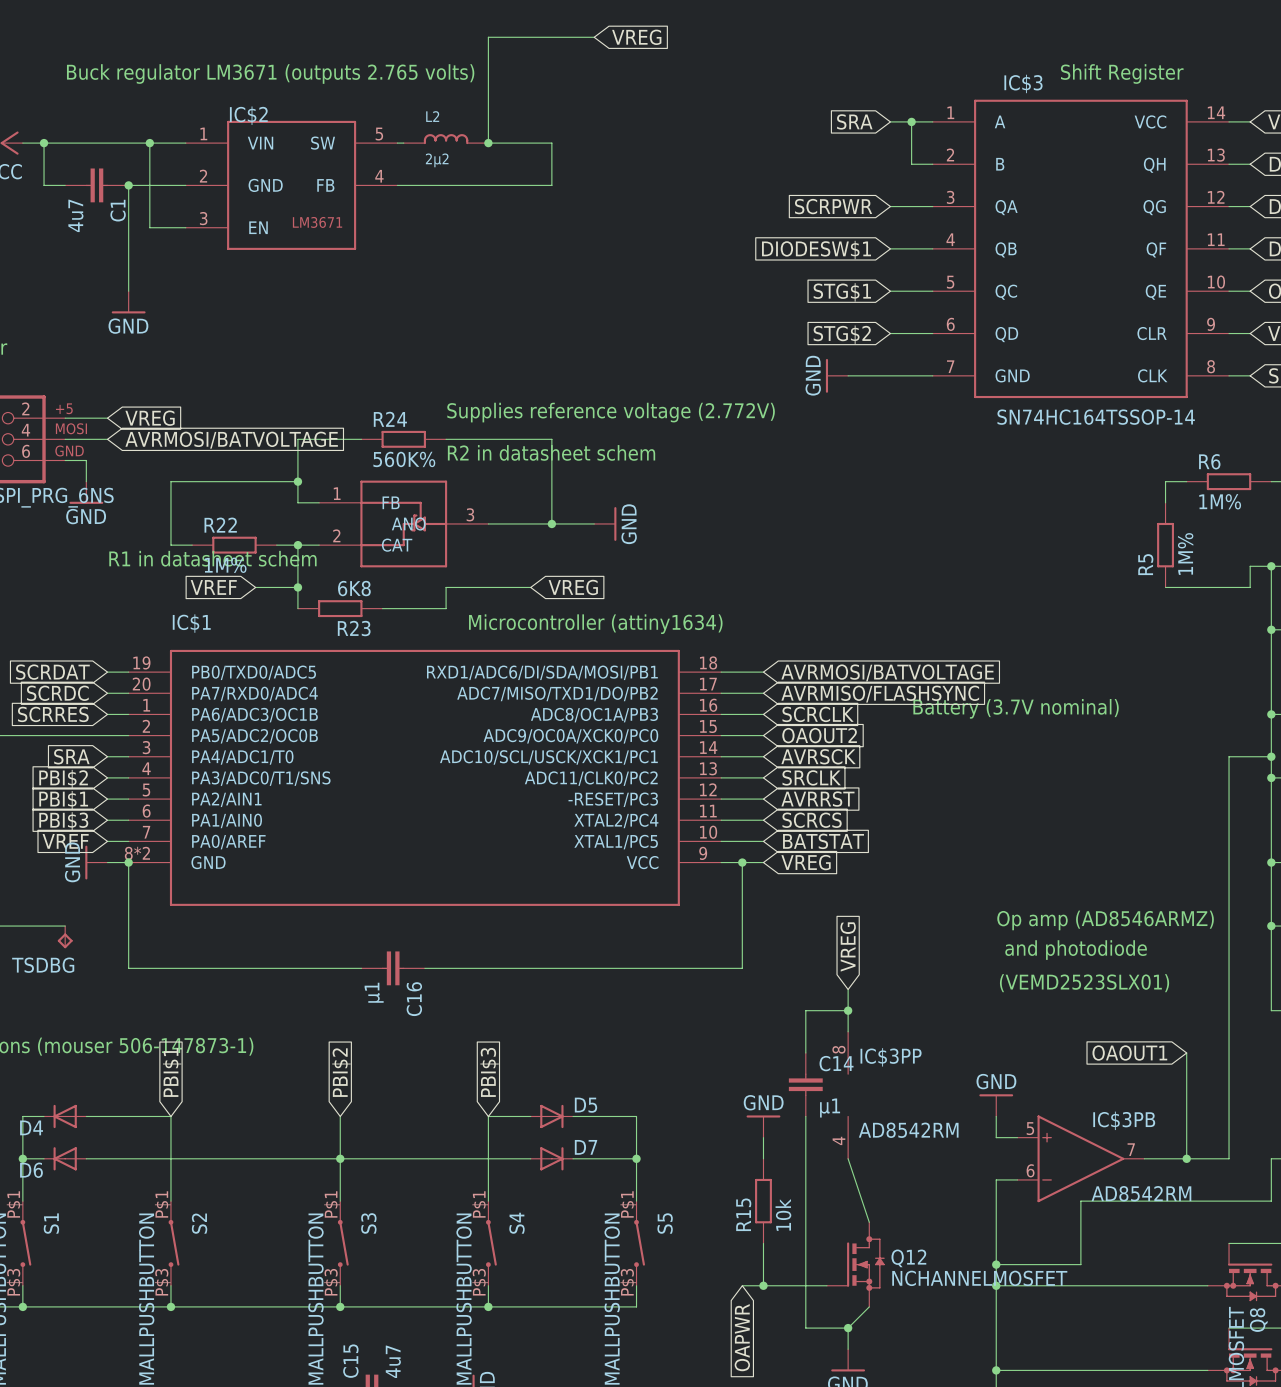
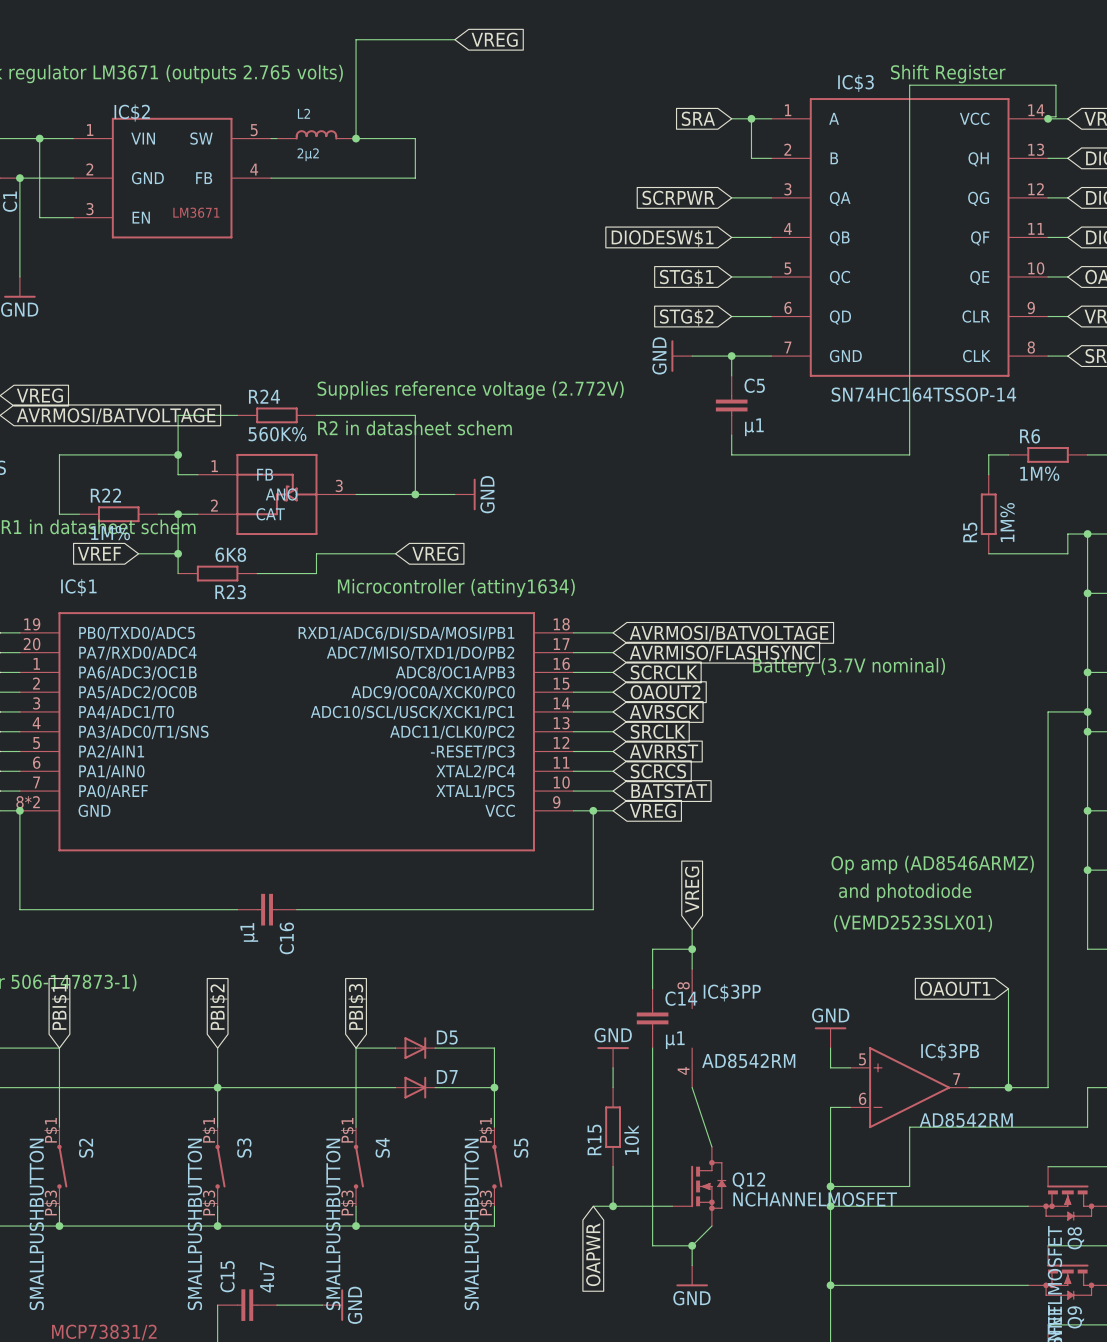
wire: none -> (1048, 118) (1048, 116) (1055, 116) (1055, 85) (909, 85) (909, 454) (731, 454) (731, 435)
junction: none -> (1048, 118)
wire: none -> (731, 356) (731, 375)
junction: none -> (731, 356)
C5: none -> µ1 (731, 405)

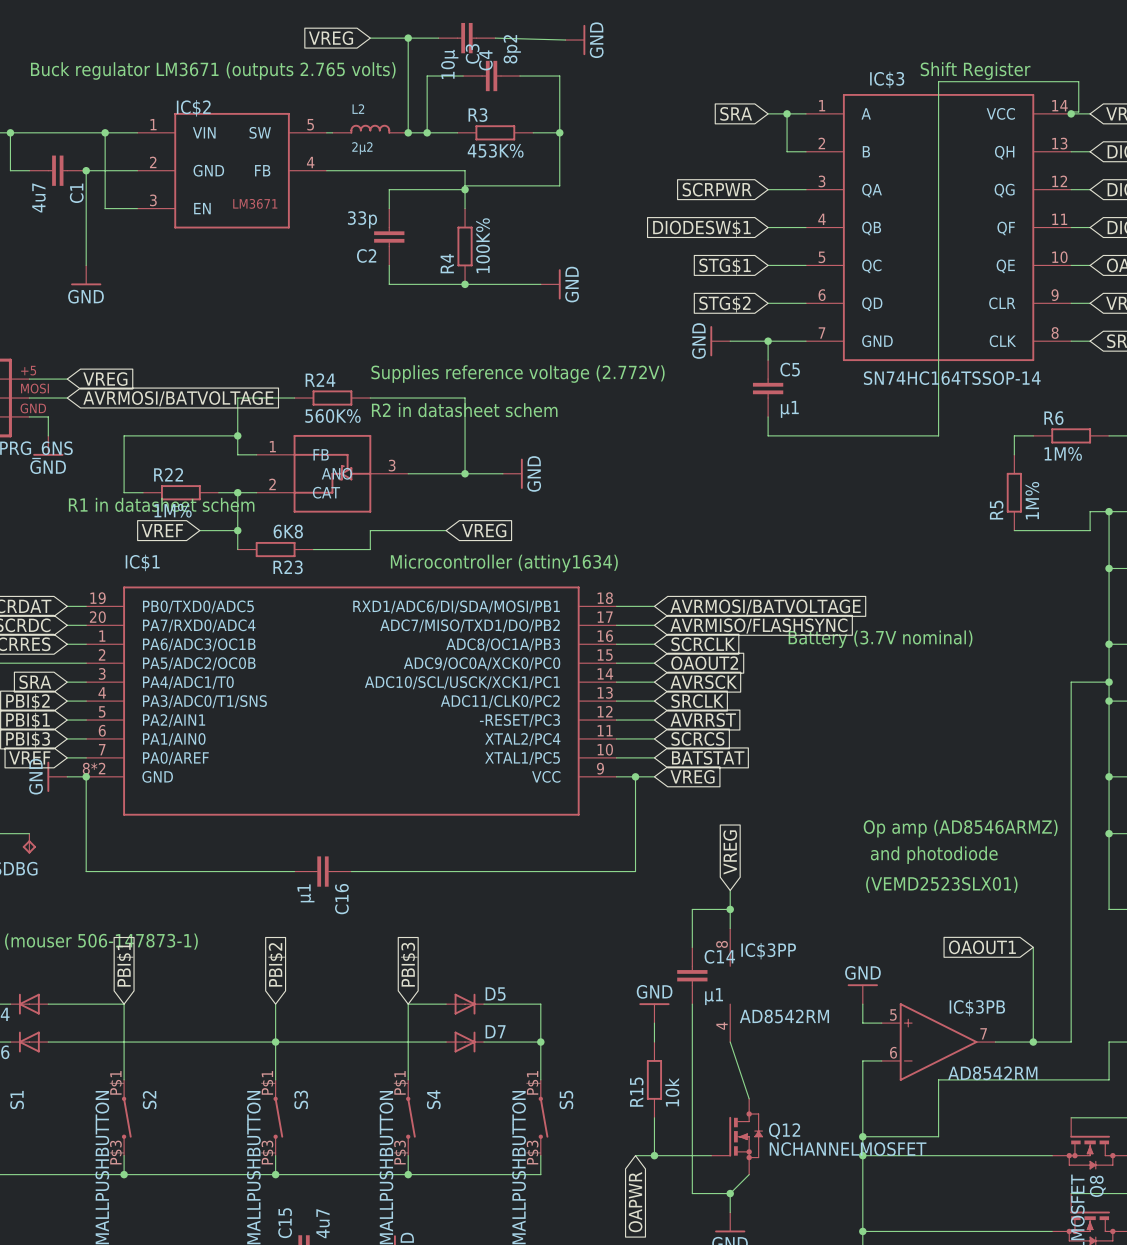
wire: none -> (370, 38) (408, 38)
junction: none -> (408, 38)
C4: none -> 10µ (466, 38)
wire: none -> (495, 38) (565, 40)
global label rotation: 0° (494, 39) -> 180° (331, 38)
global label position: VREG (494, 39) -> VREG (331, 38)
power symbol: none -> GND (575, 40)
wire: none -> (463, 76) (427, 76) (427, 132)
C3: none -> 8p2 (491, 76)
wire: none -> (519, 76) (559, 76) (559, 185) (465, 185)
junction: none -> (427, 132)
wire: (407, 138) (415, 138) (415, 178) -> (465, 208) (465, 170)
R3: none -> 453K% (495, 132)
wire: none -> (533, 132) (559, 132)
junction: none -> (559, 132)
wire: none -> (465, 189) (389, 189) (389, 208)
junction: none -> (465, 189)
C2: none -> 33p (389, 237)
R4: none -> 100K% (465, 246)
wire: none -> (389, 265) (389, 284) (540, 284)
junction: none -> (465, 284)
power symbol: none -> GND (550, 284)

